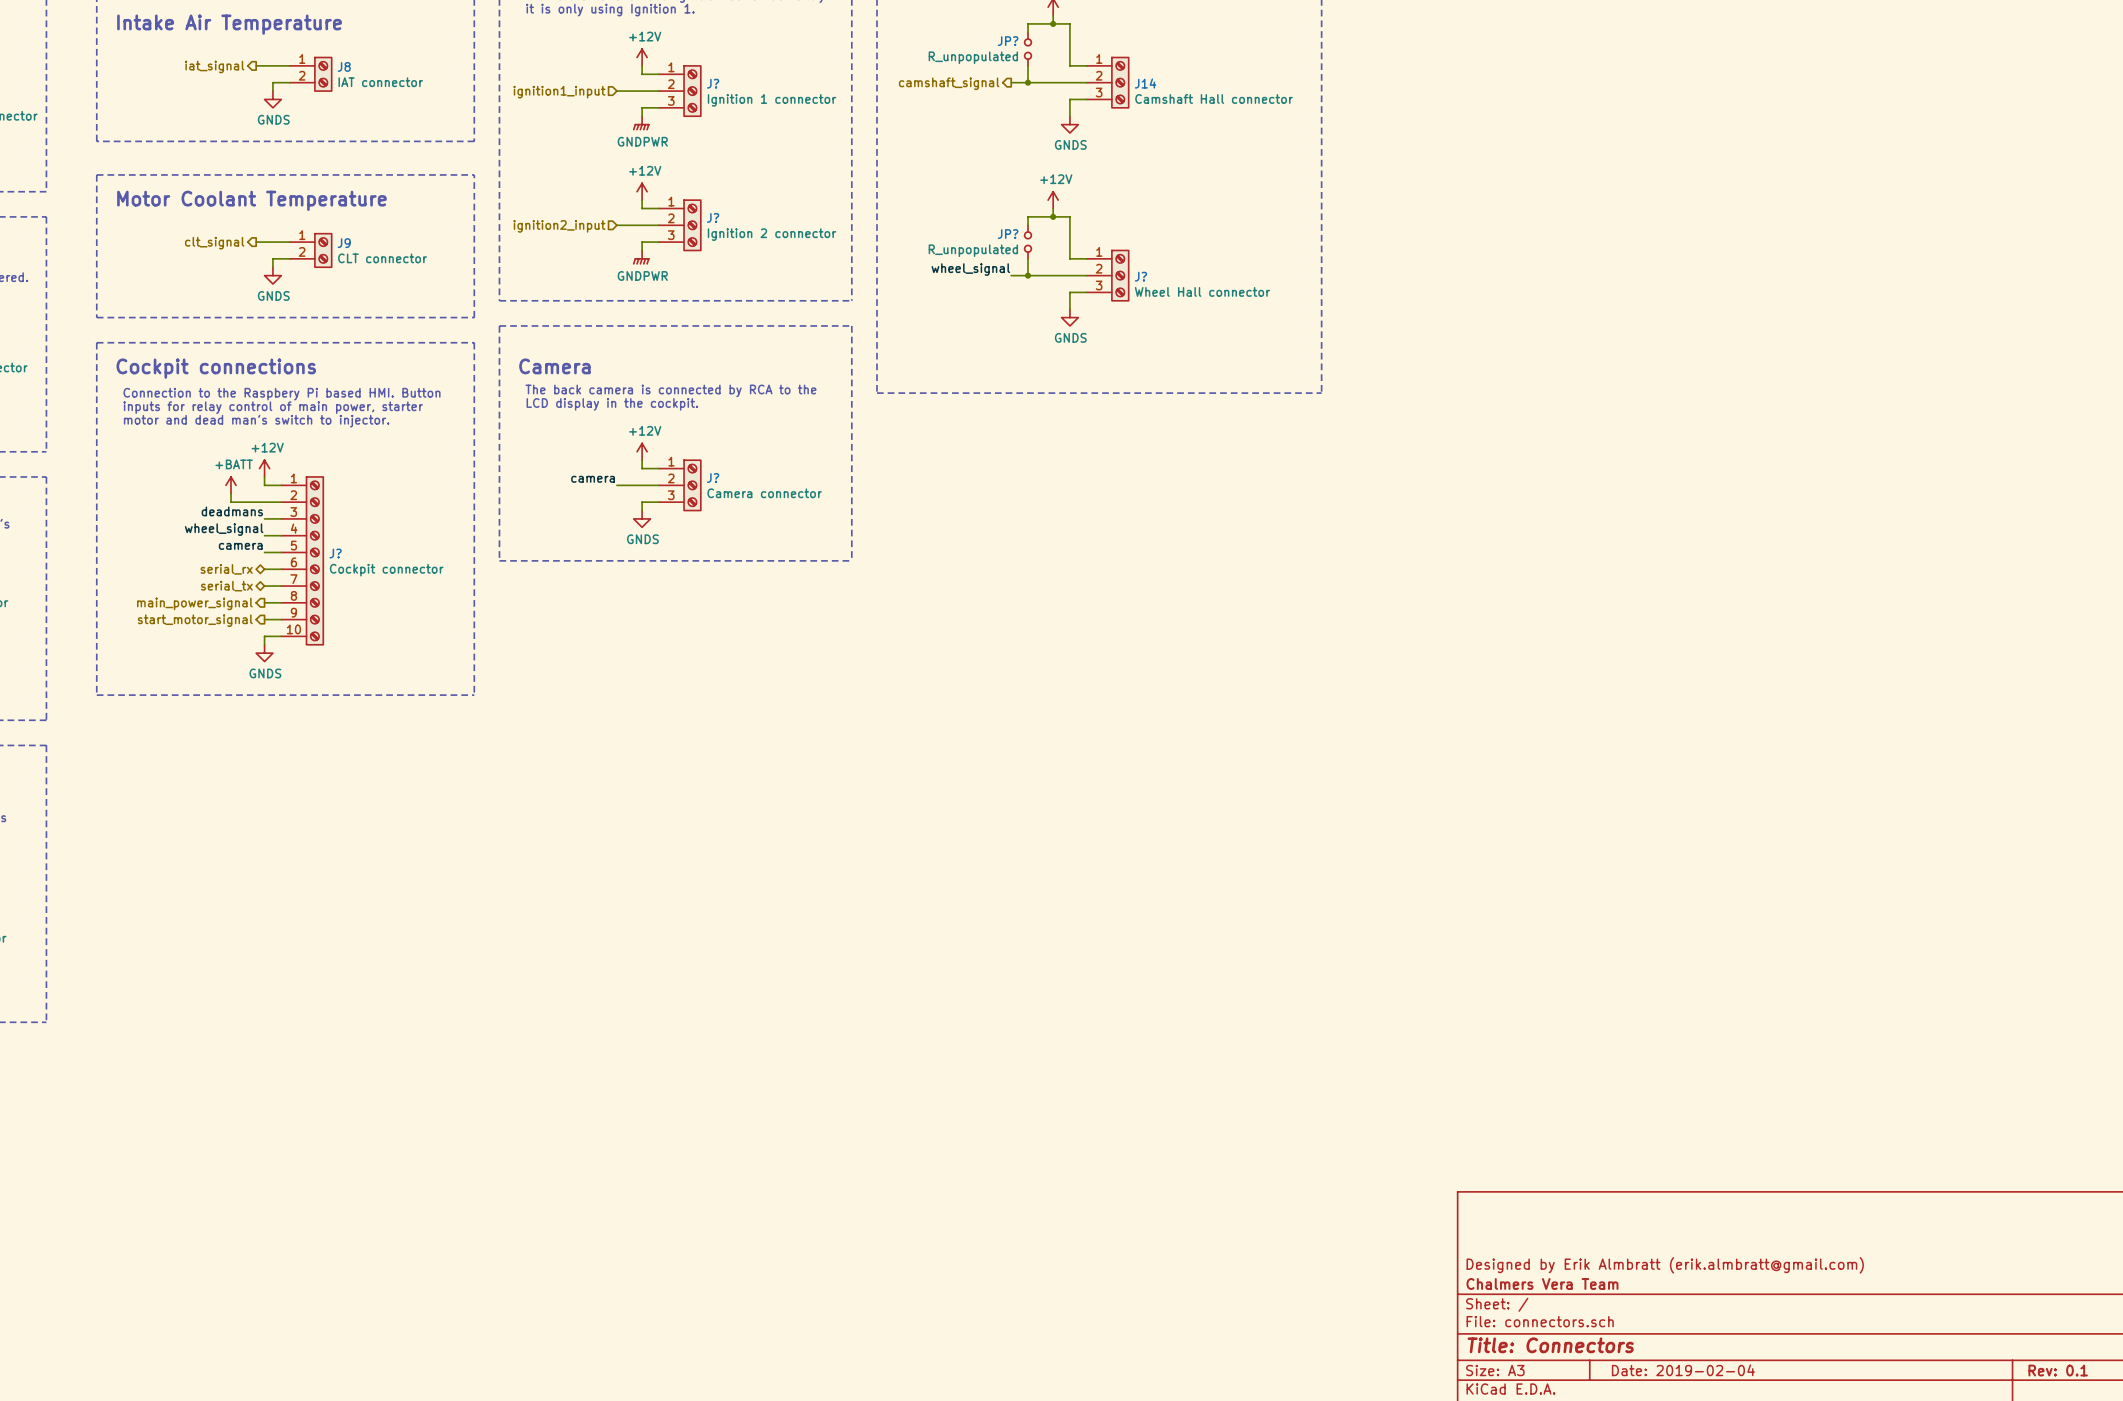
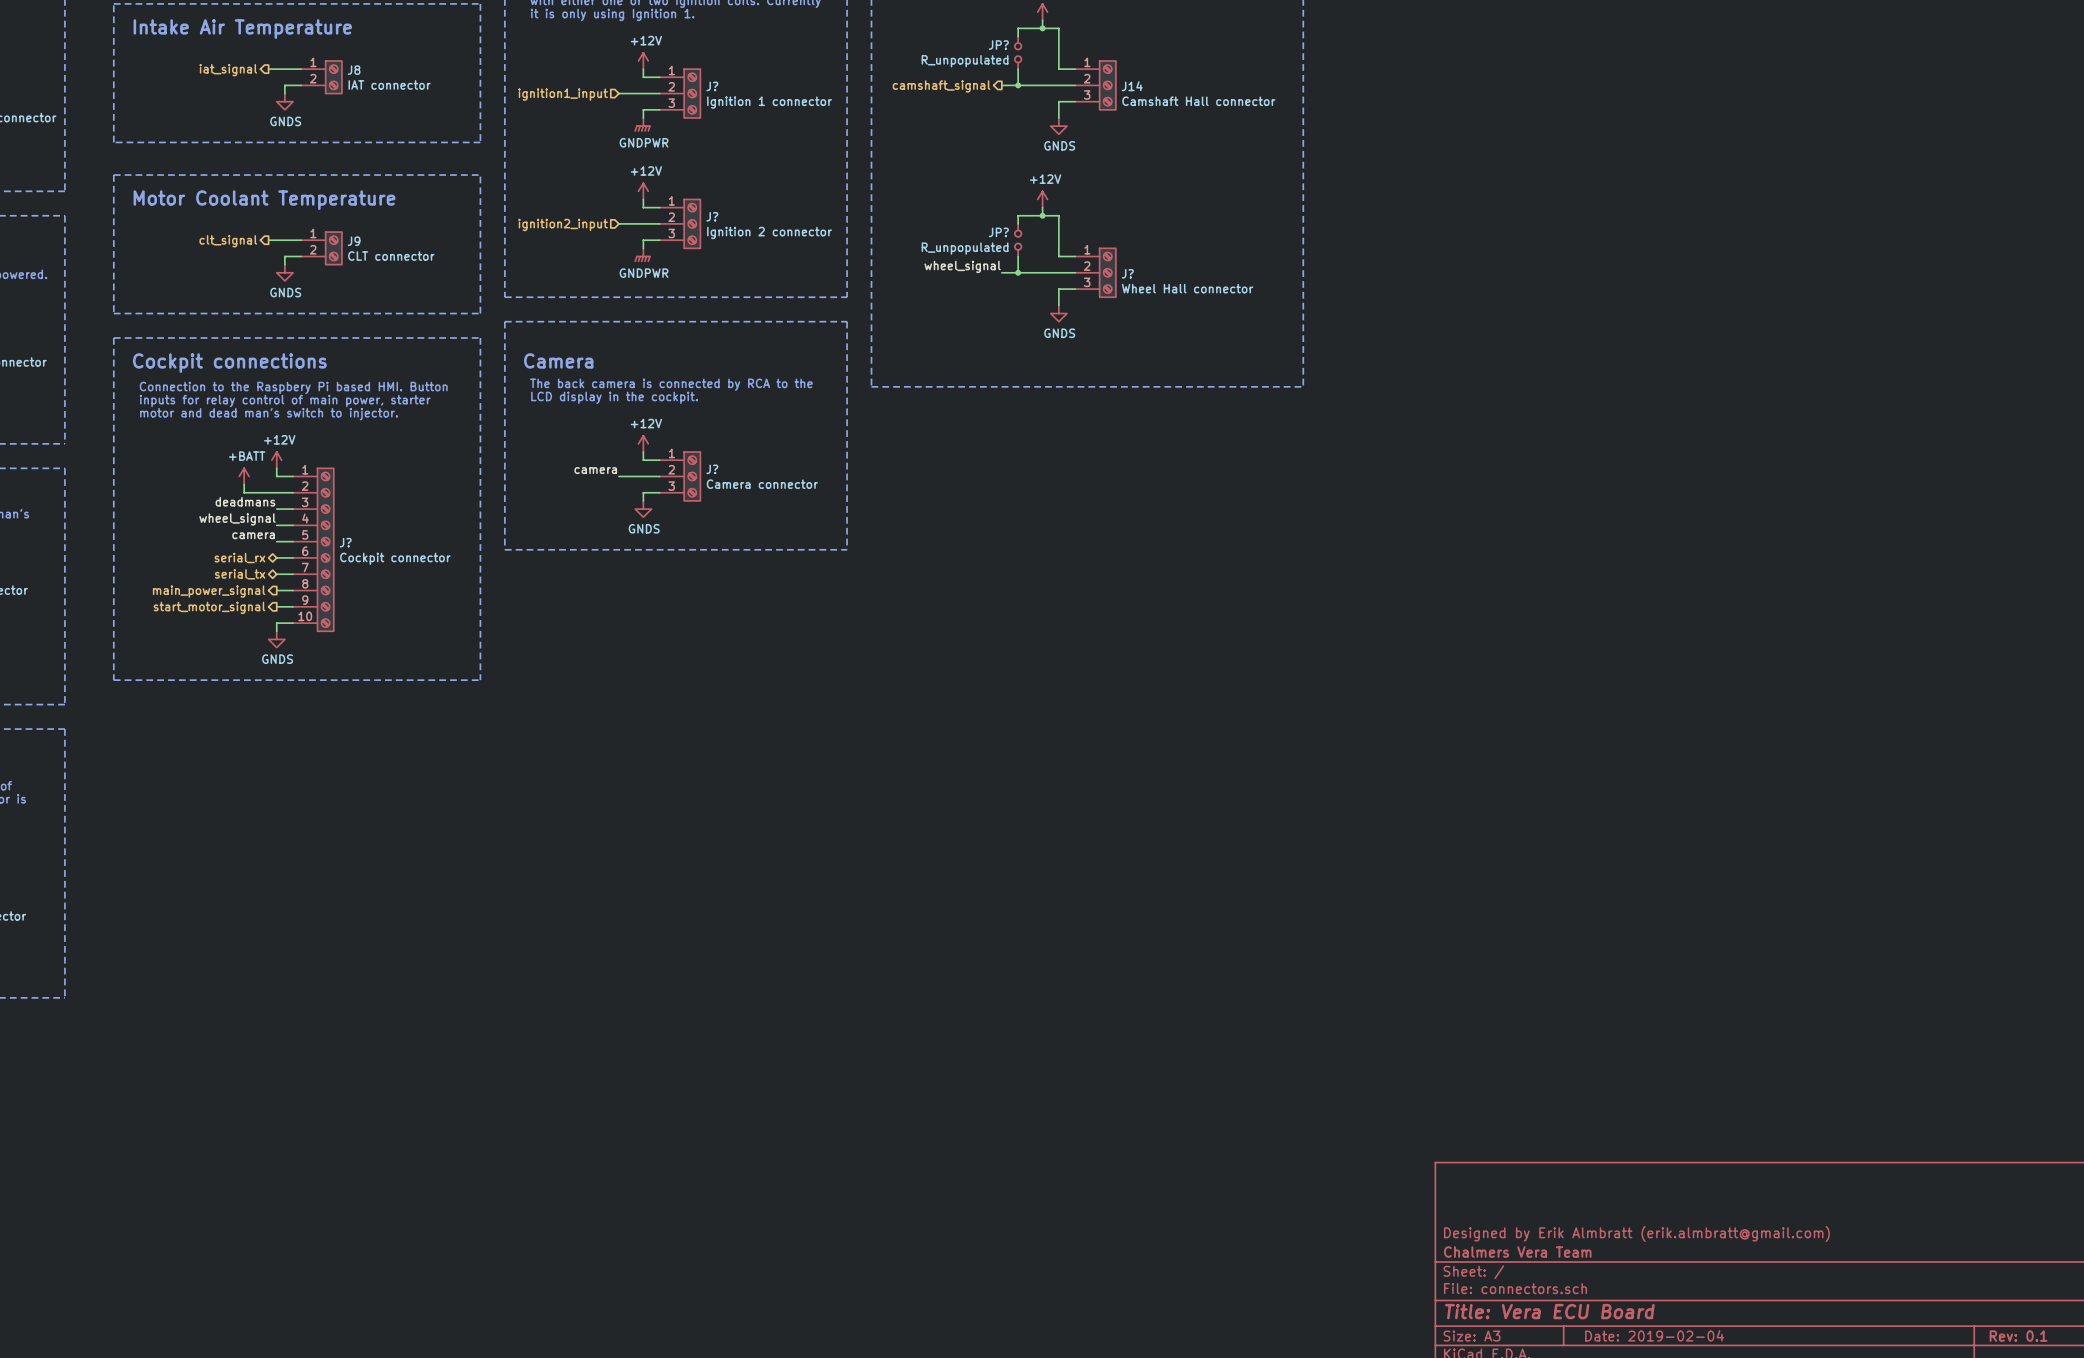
title block: Title: Connectors (1550, 1345) -> Title: Vera ECU Board (1549, 1311)

